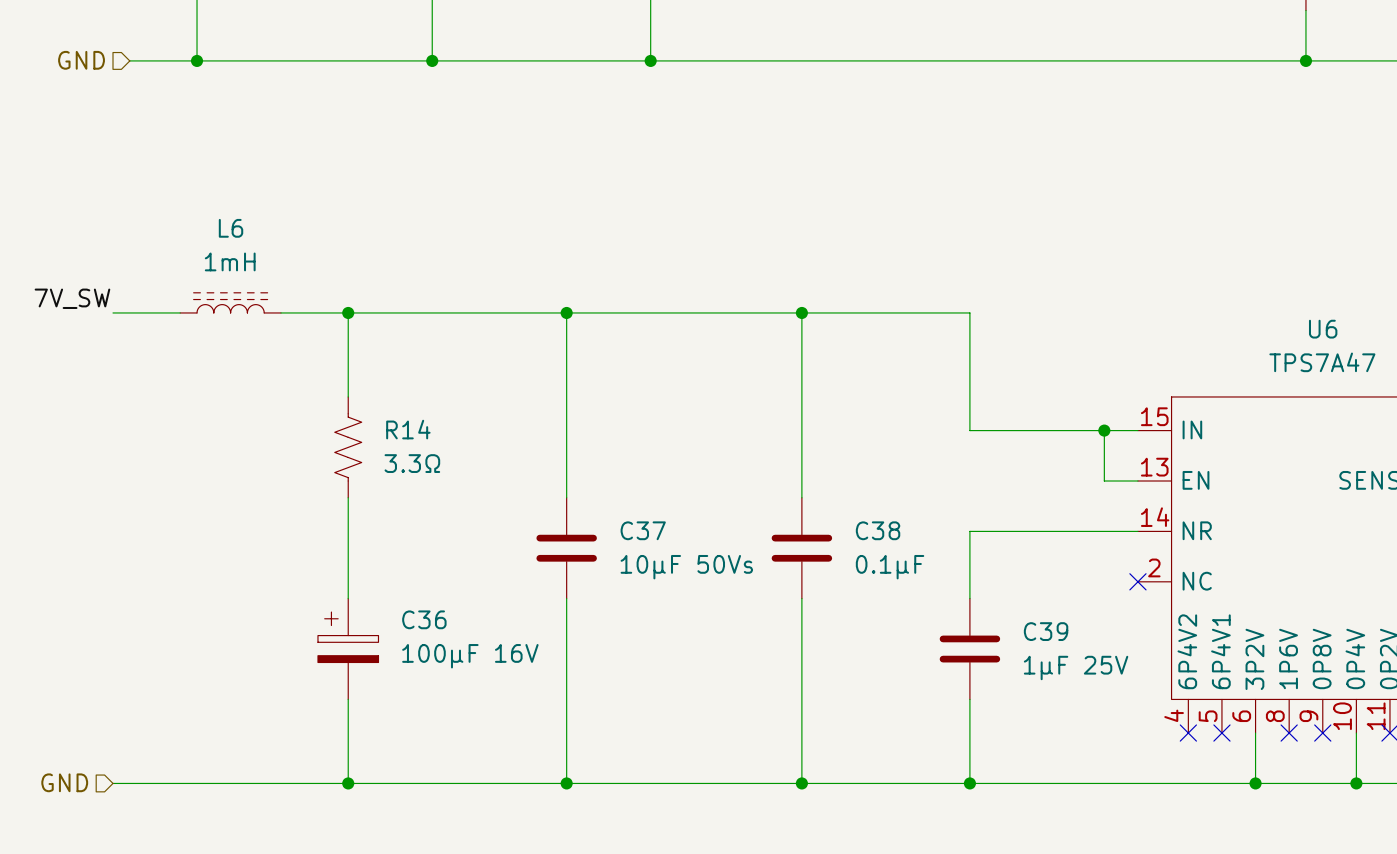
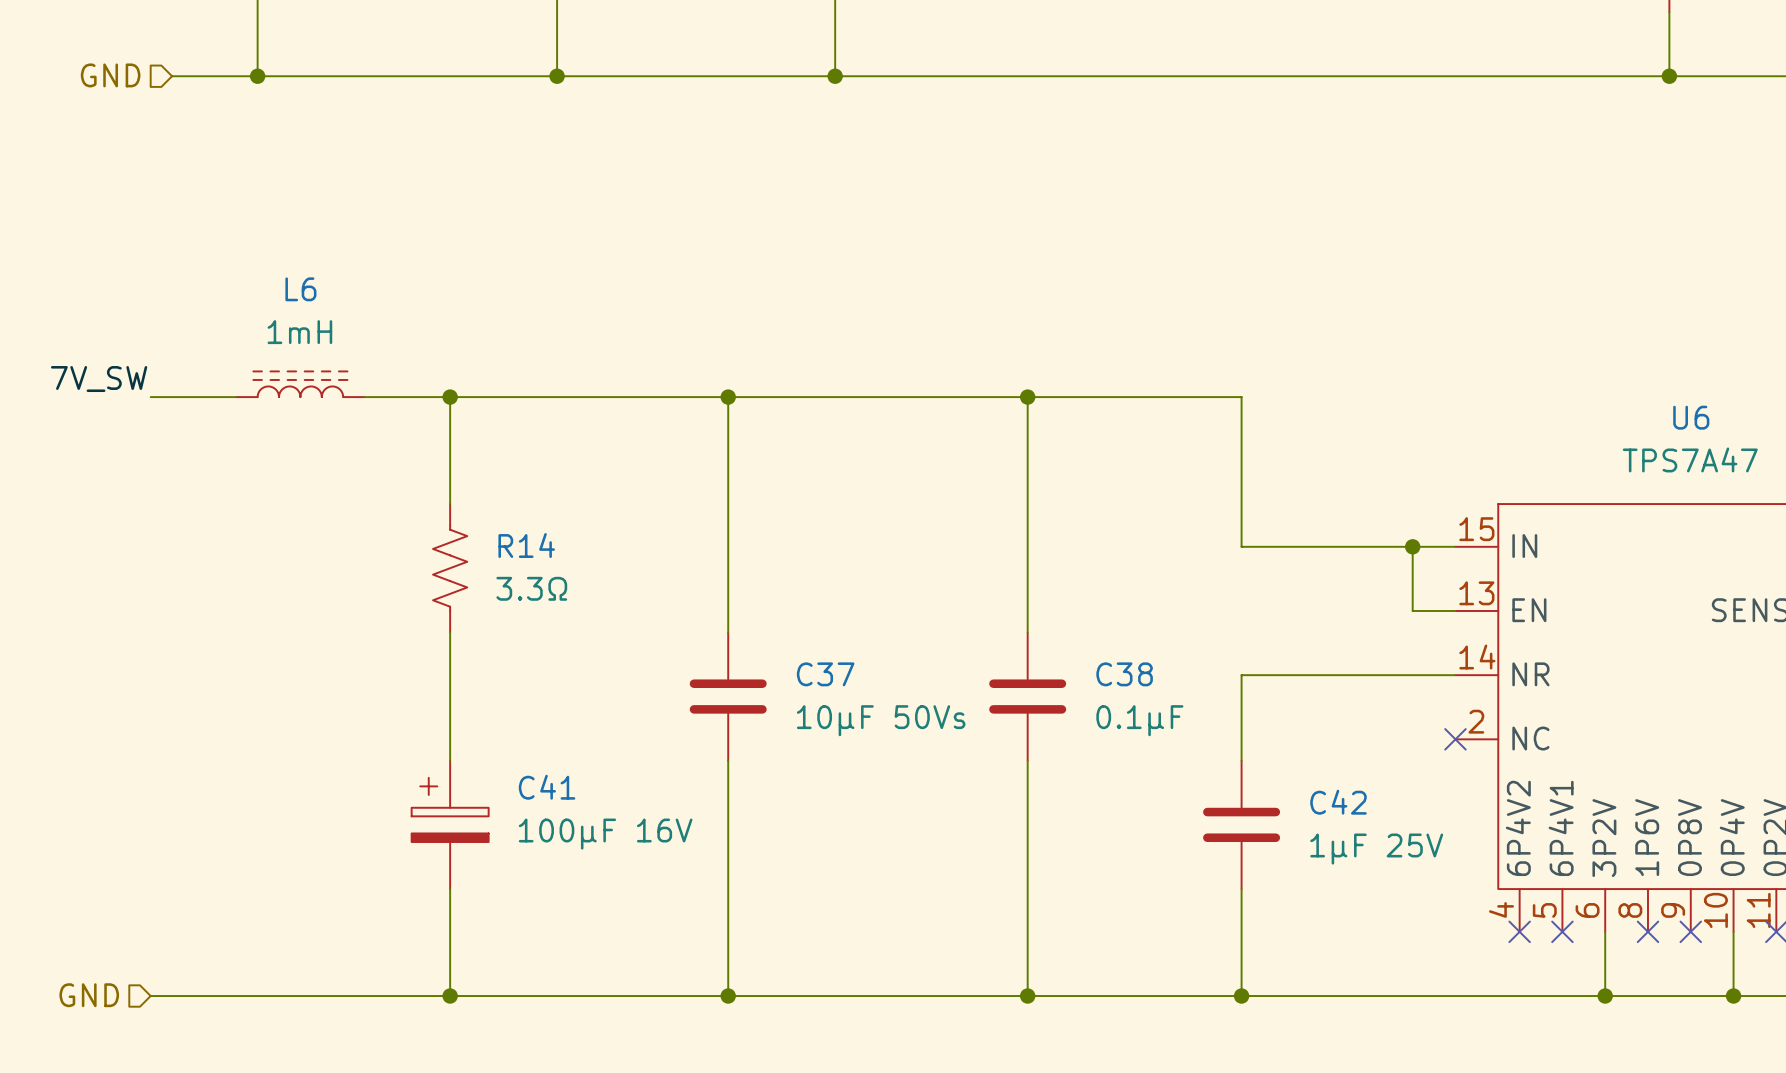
C36 name: C36 (424, 619) -> C41 (547, 787)
C39 name: C39 (1046, 631) -> C42 (1338, 802)

